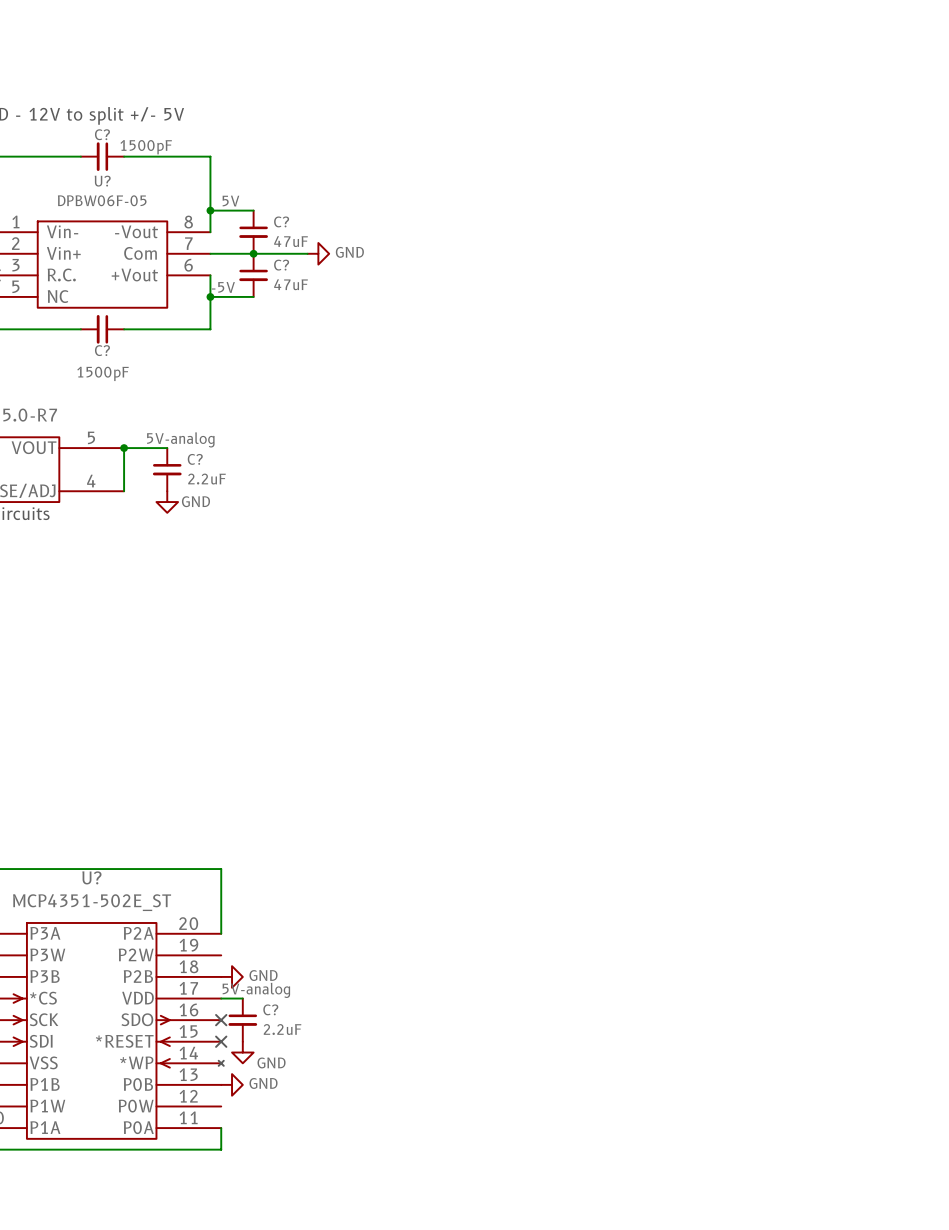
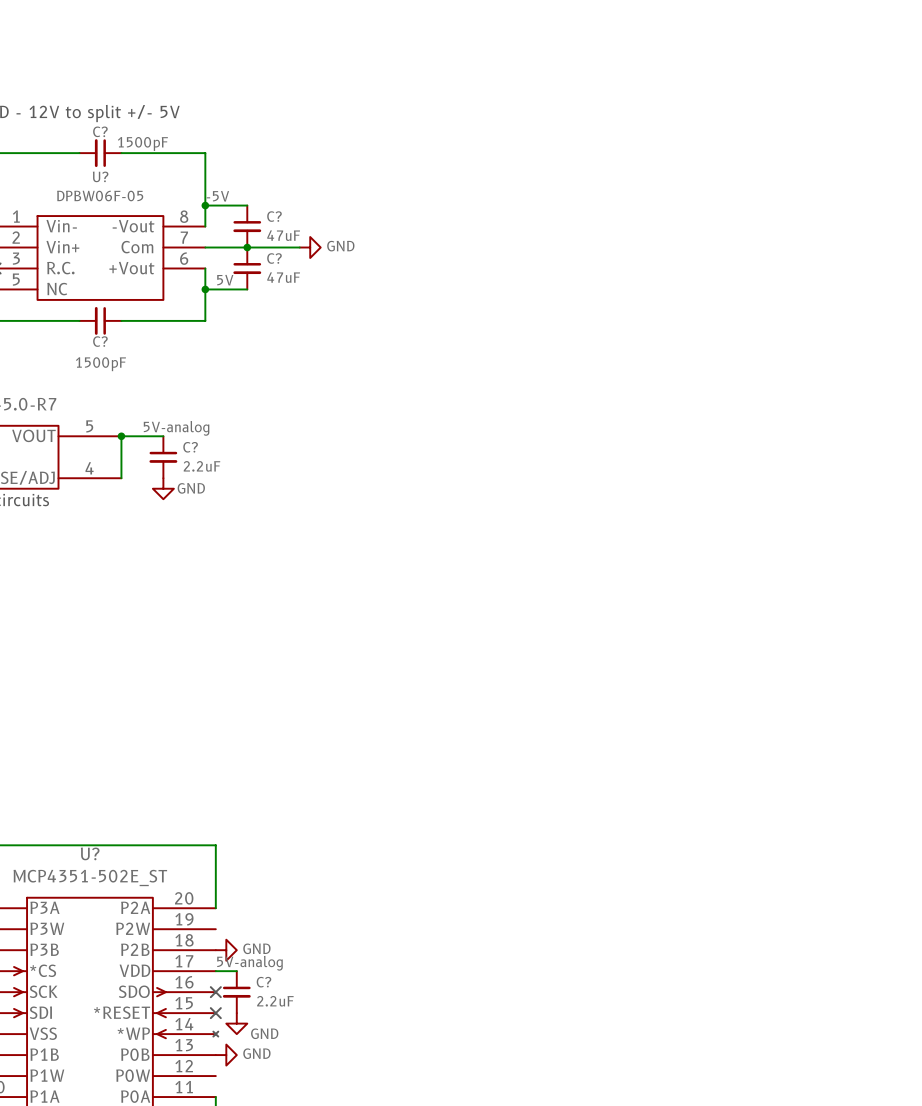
label position: 5V (230, 201) -> 5V (225, 280)
label position: -5V (223, 287) -> -5V (217, 196)

